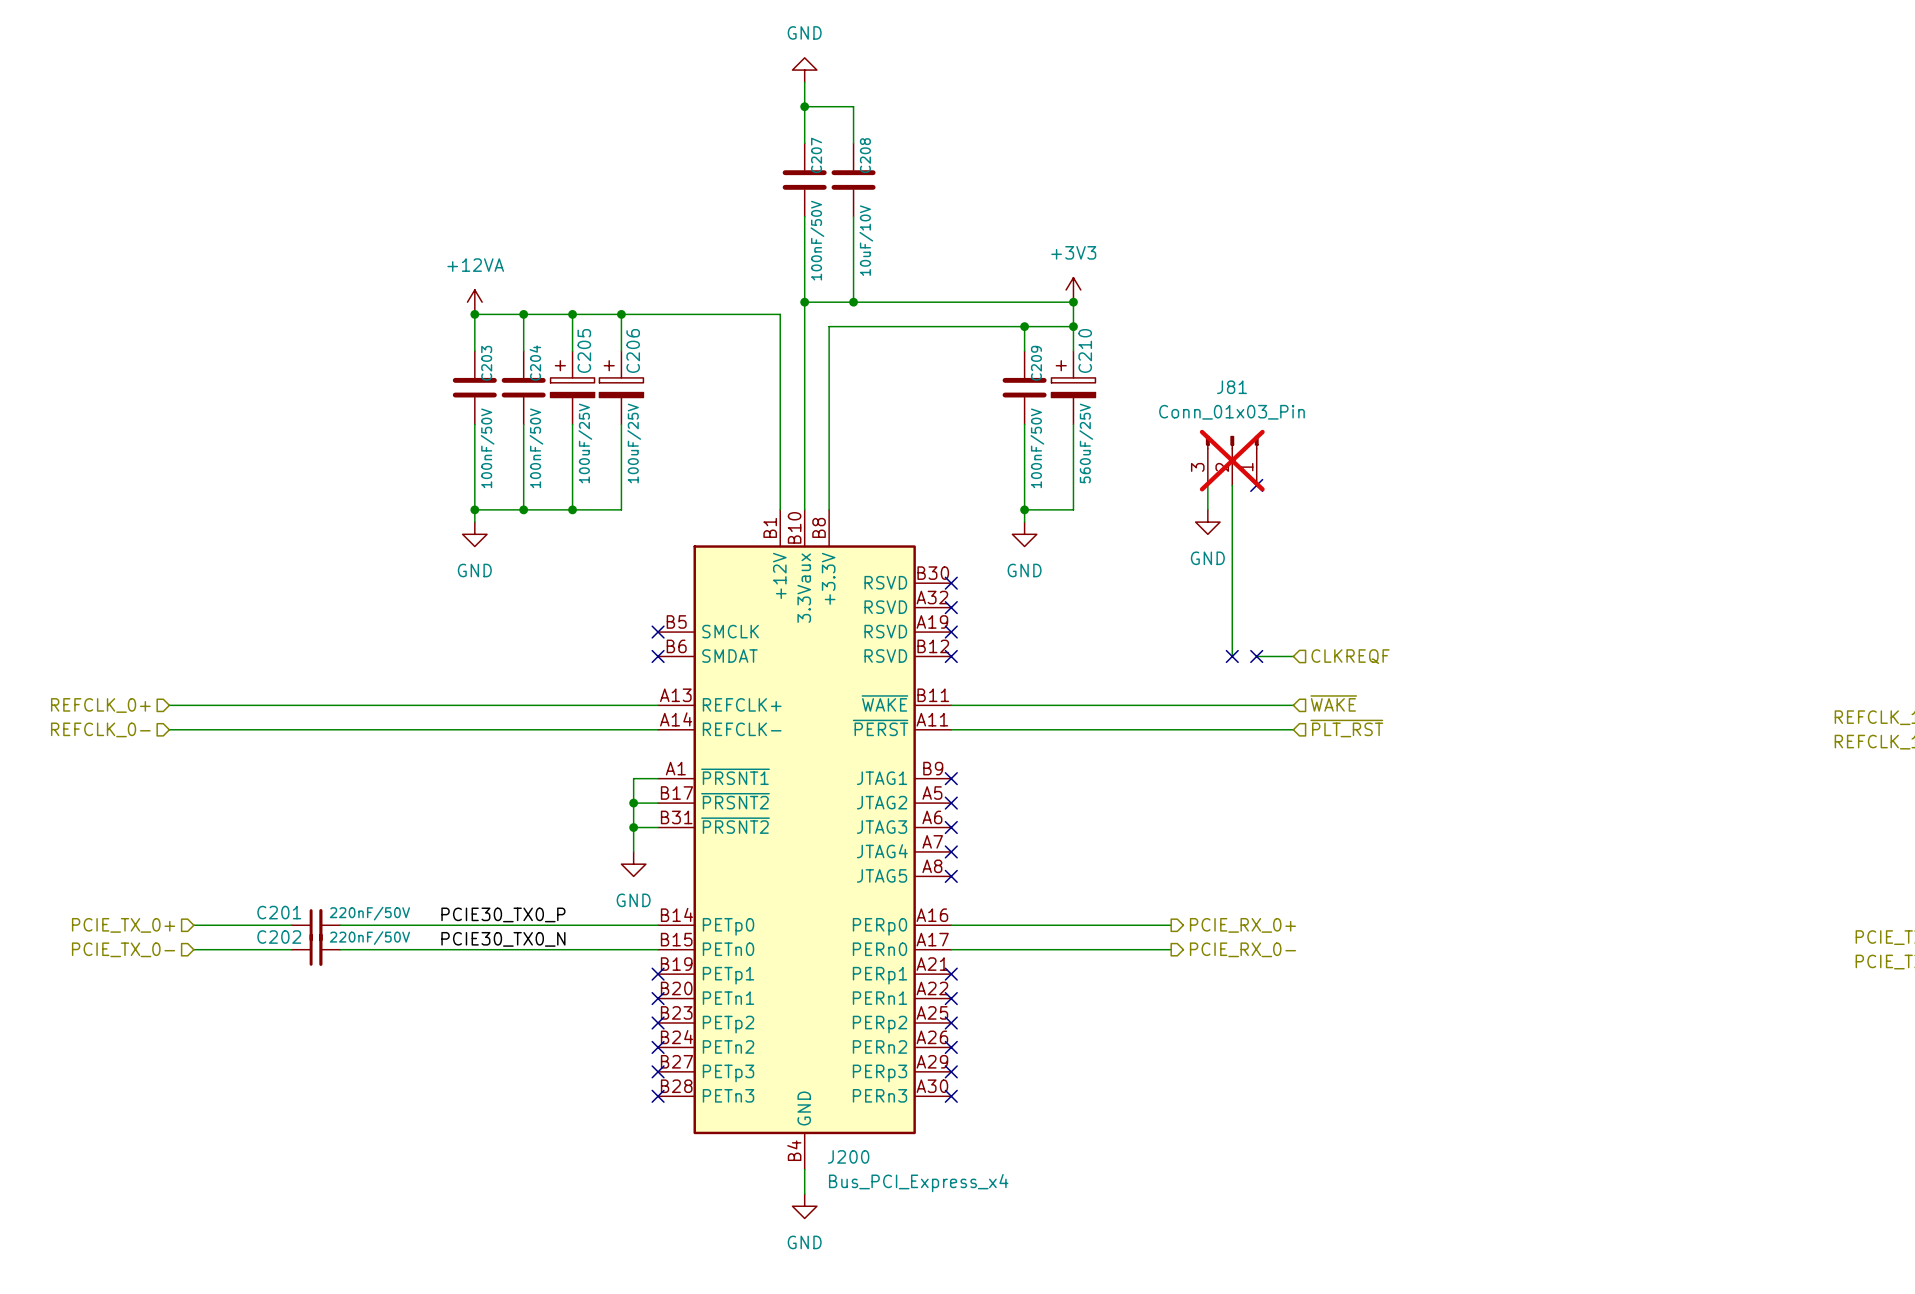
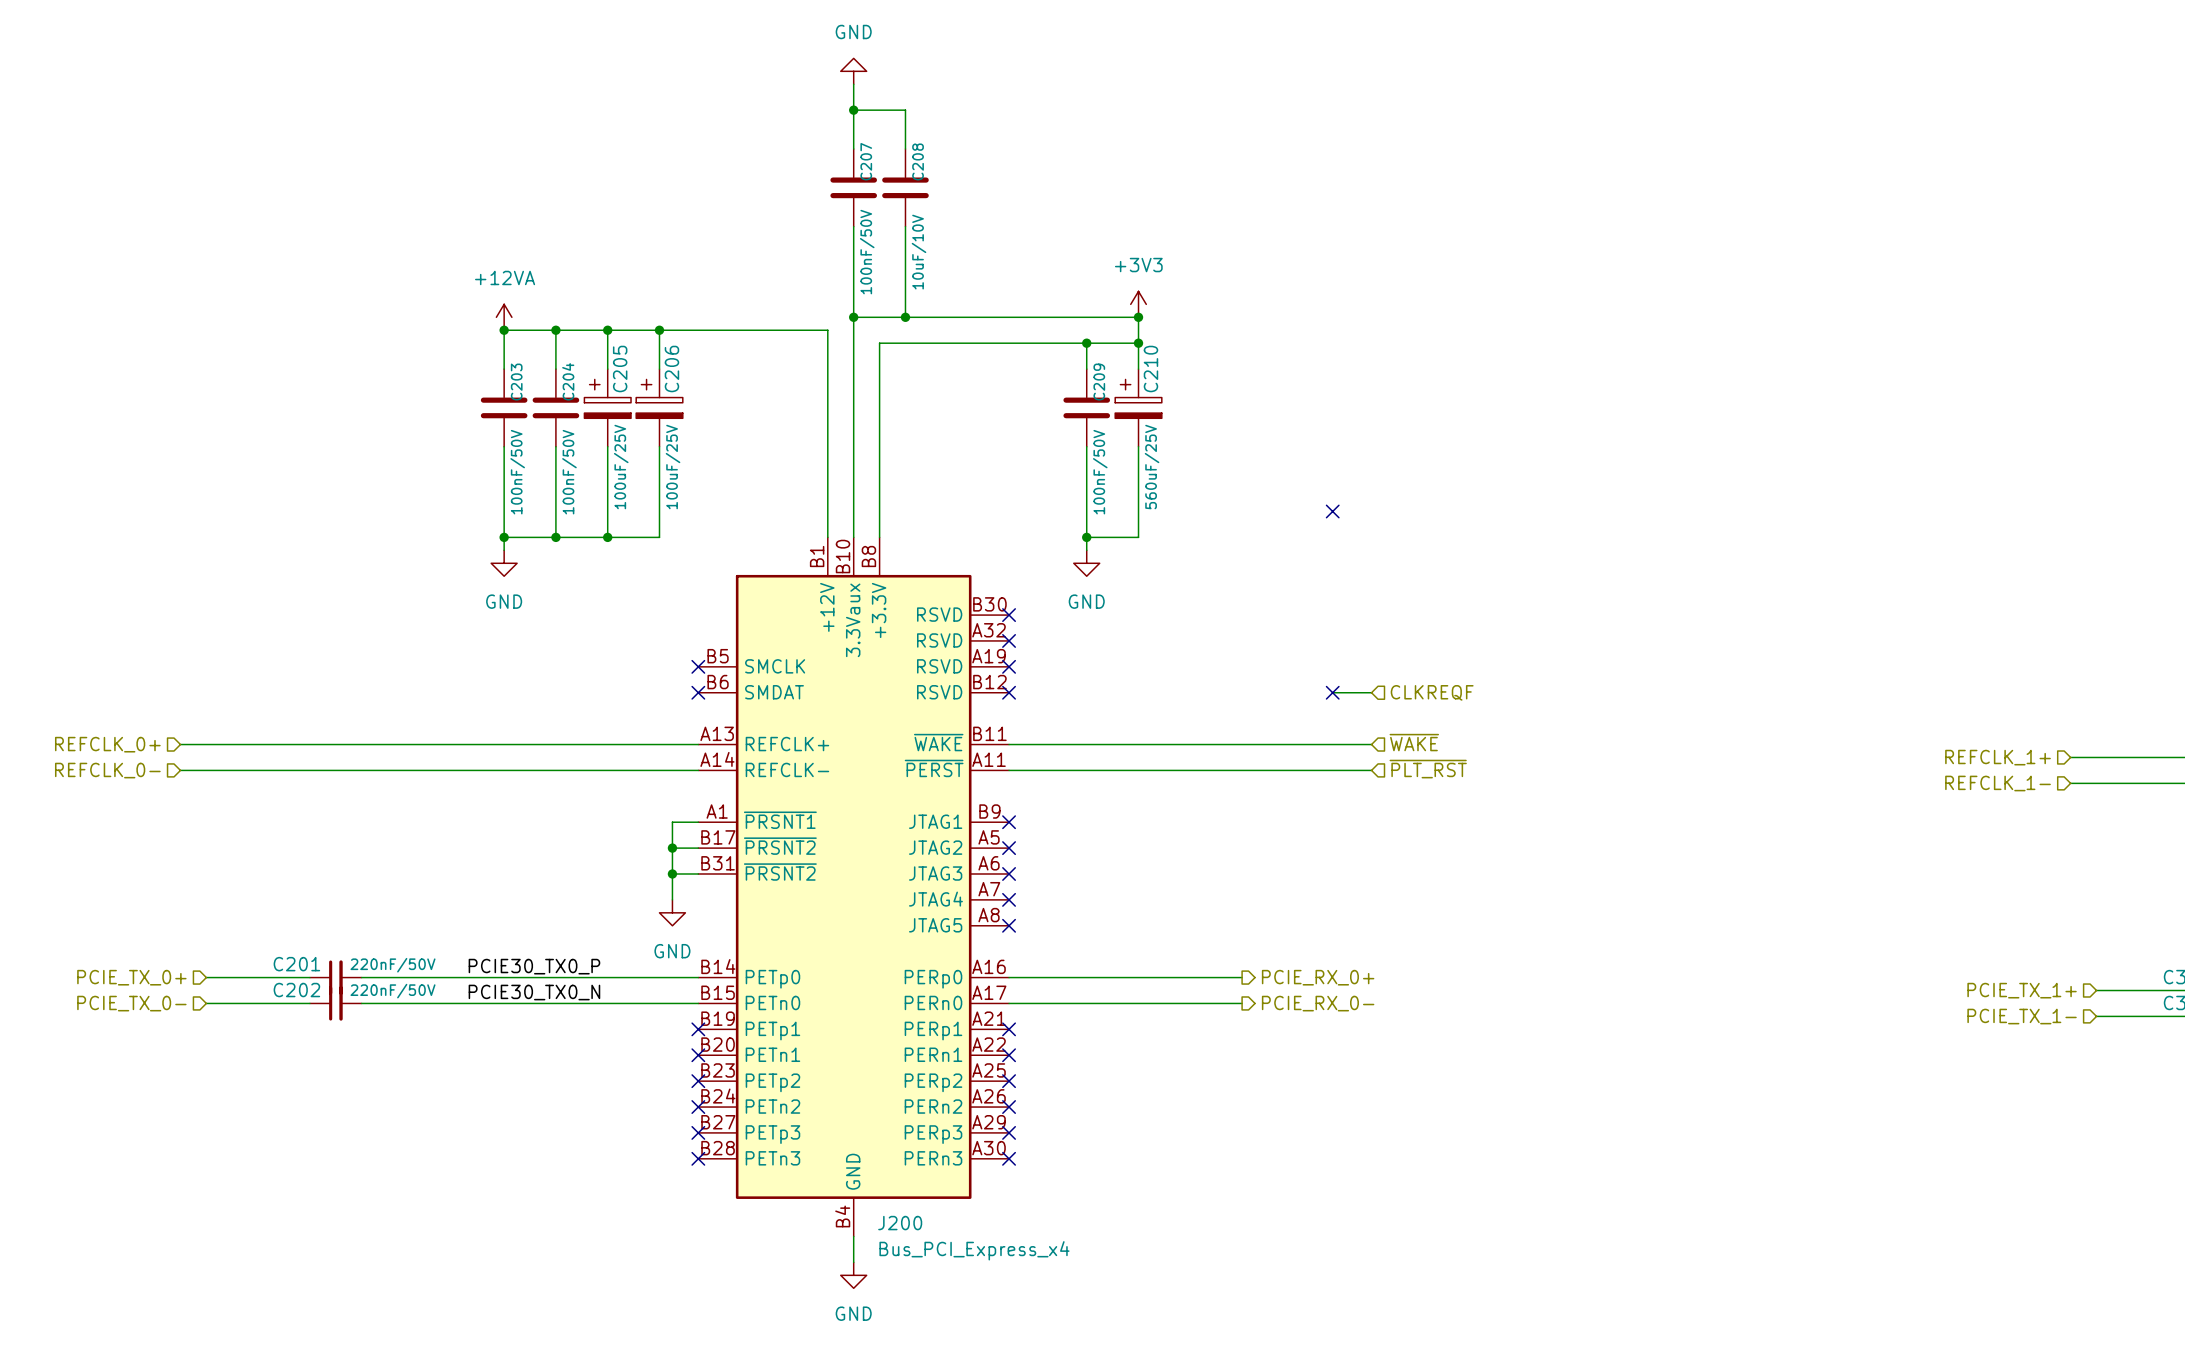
J81: Conn_01x03_Pin (1232, 460) -> none
wire: (1207, 485) (1207, 509) -> none
wire: (1232, 485) (1232, 656) -> none
power symbol: GND (1207, 522) -> none
no-connect mark: (1232, 656) -> none

